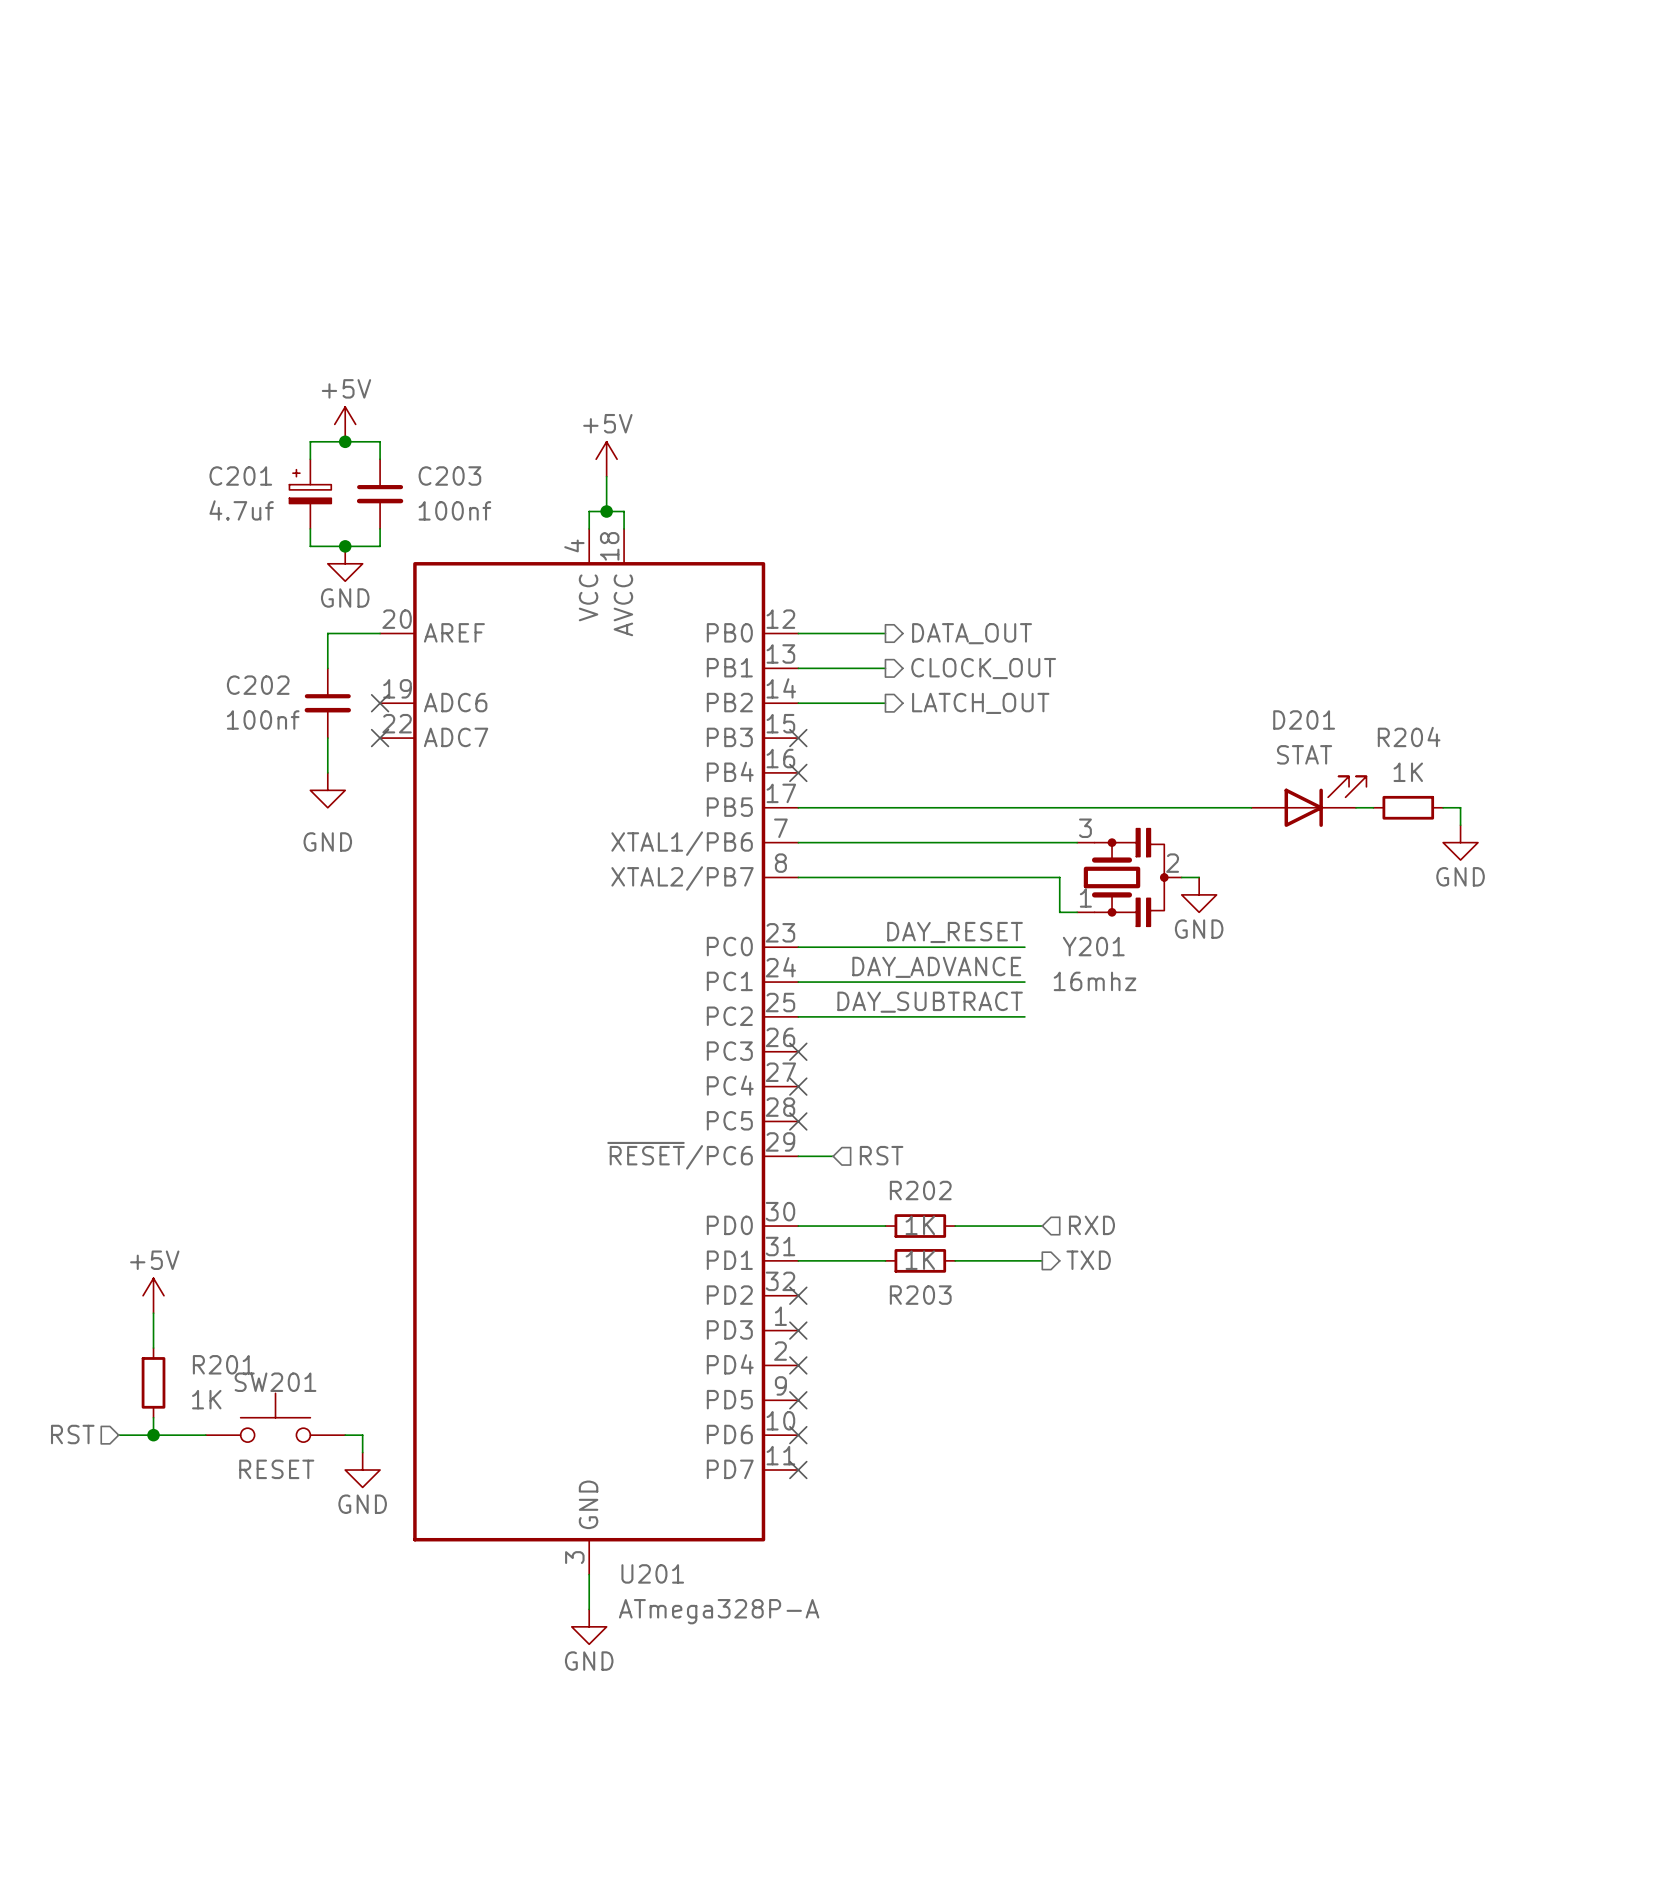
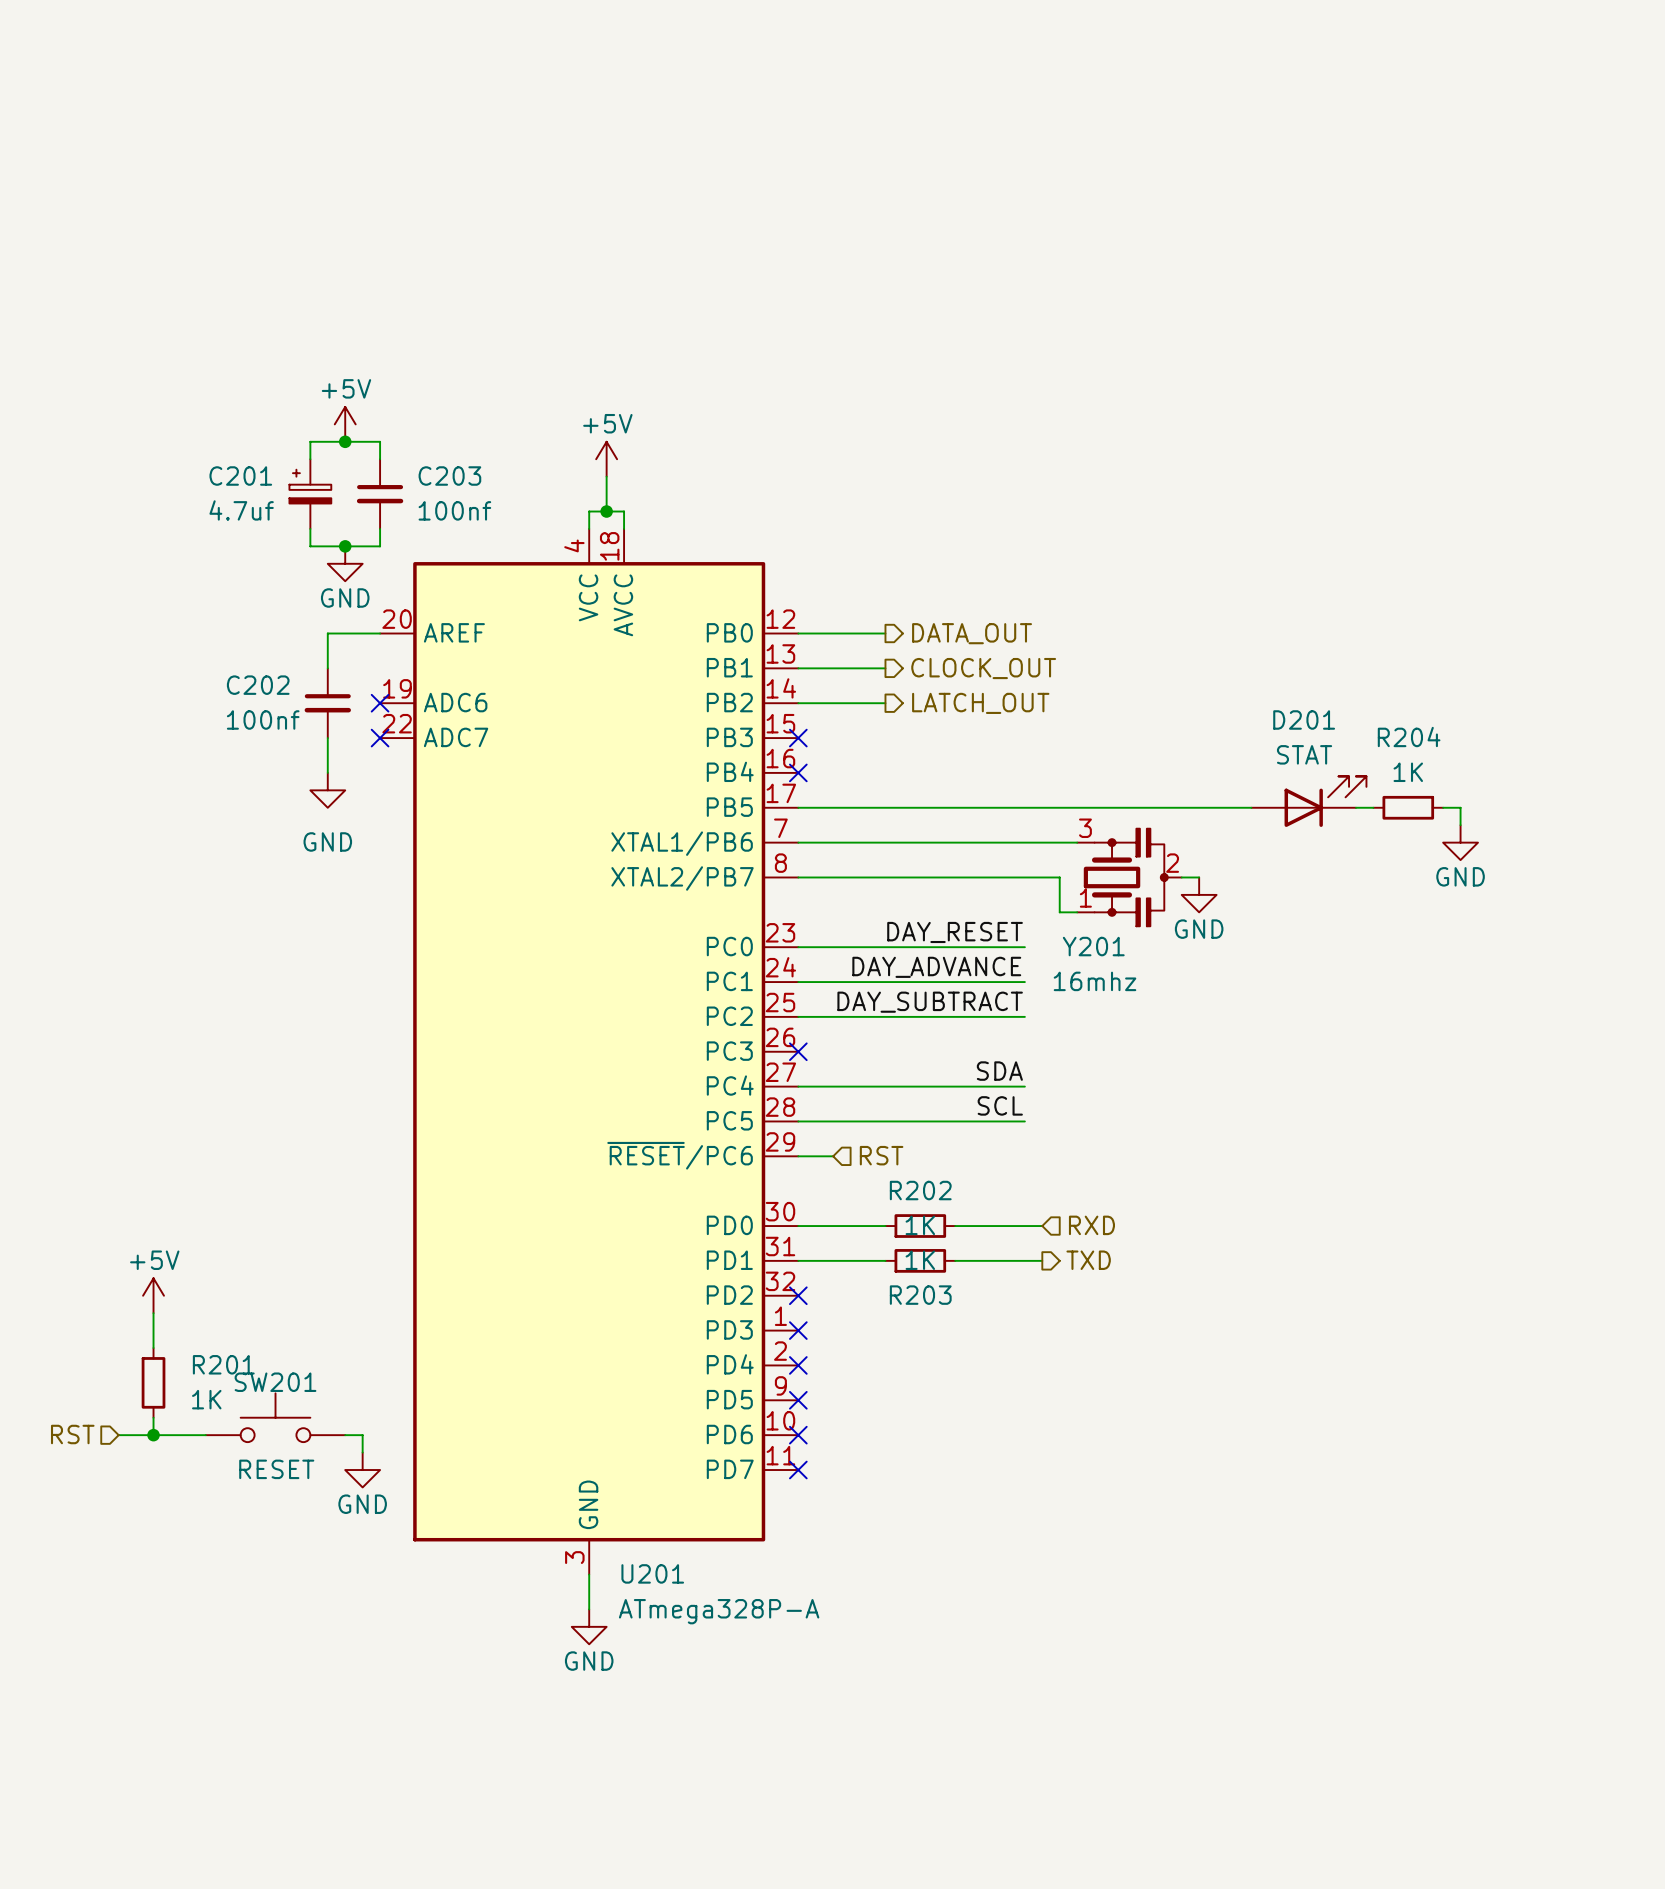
label: none -> SDA (999, 1071)
wire: none -> (798, 1086) (1024, 1086)
no-connect mark: (798, 1086) -> none
label: none -> SCL (1000, 1105)
wire: none -> (798, 1121) (1024, 1121)
no-connect mark: (798, 1121) -> none

